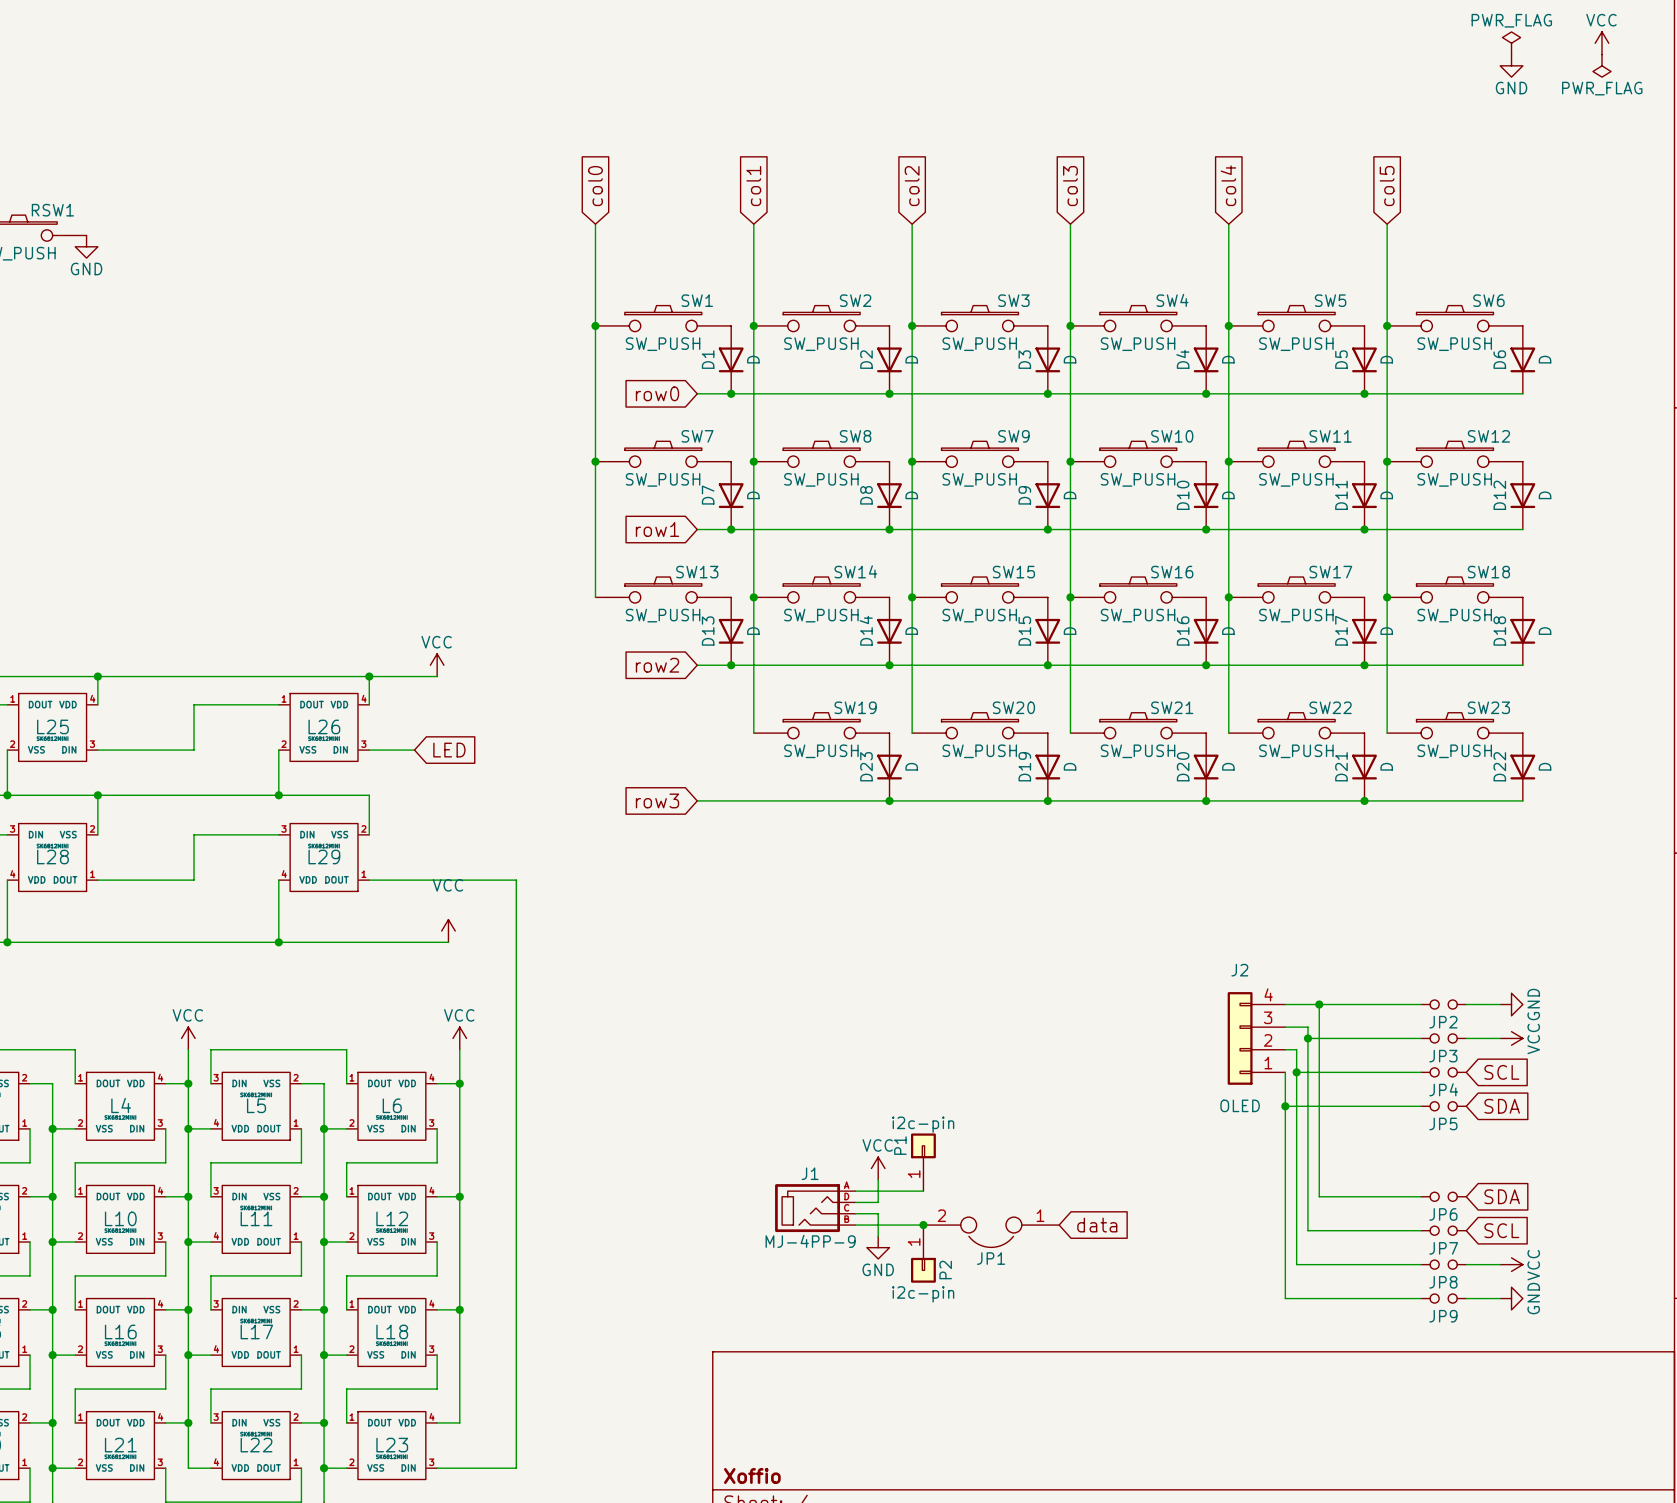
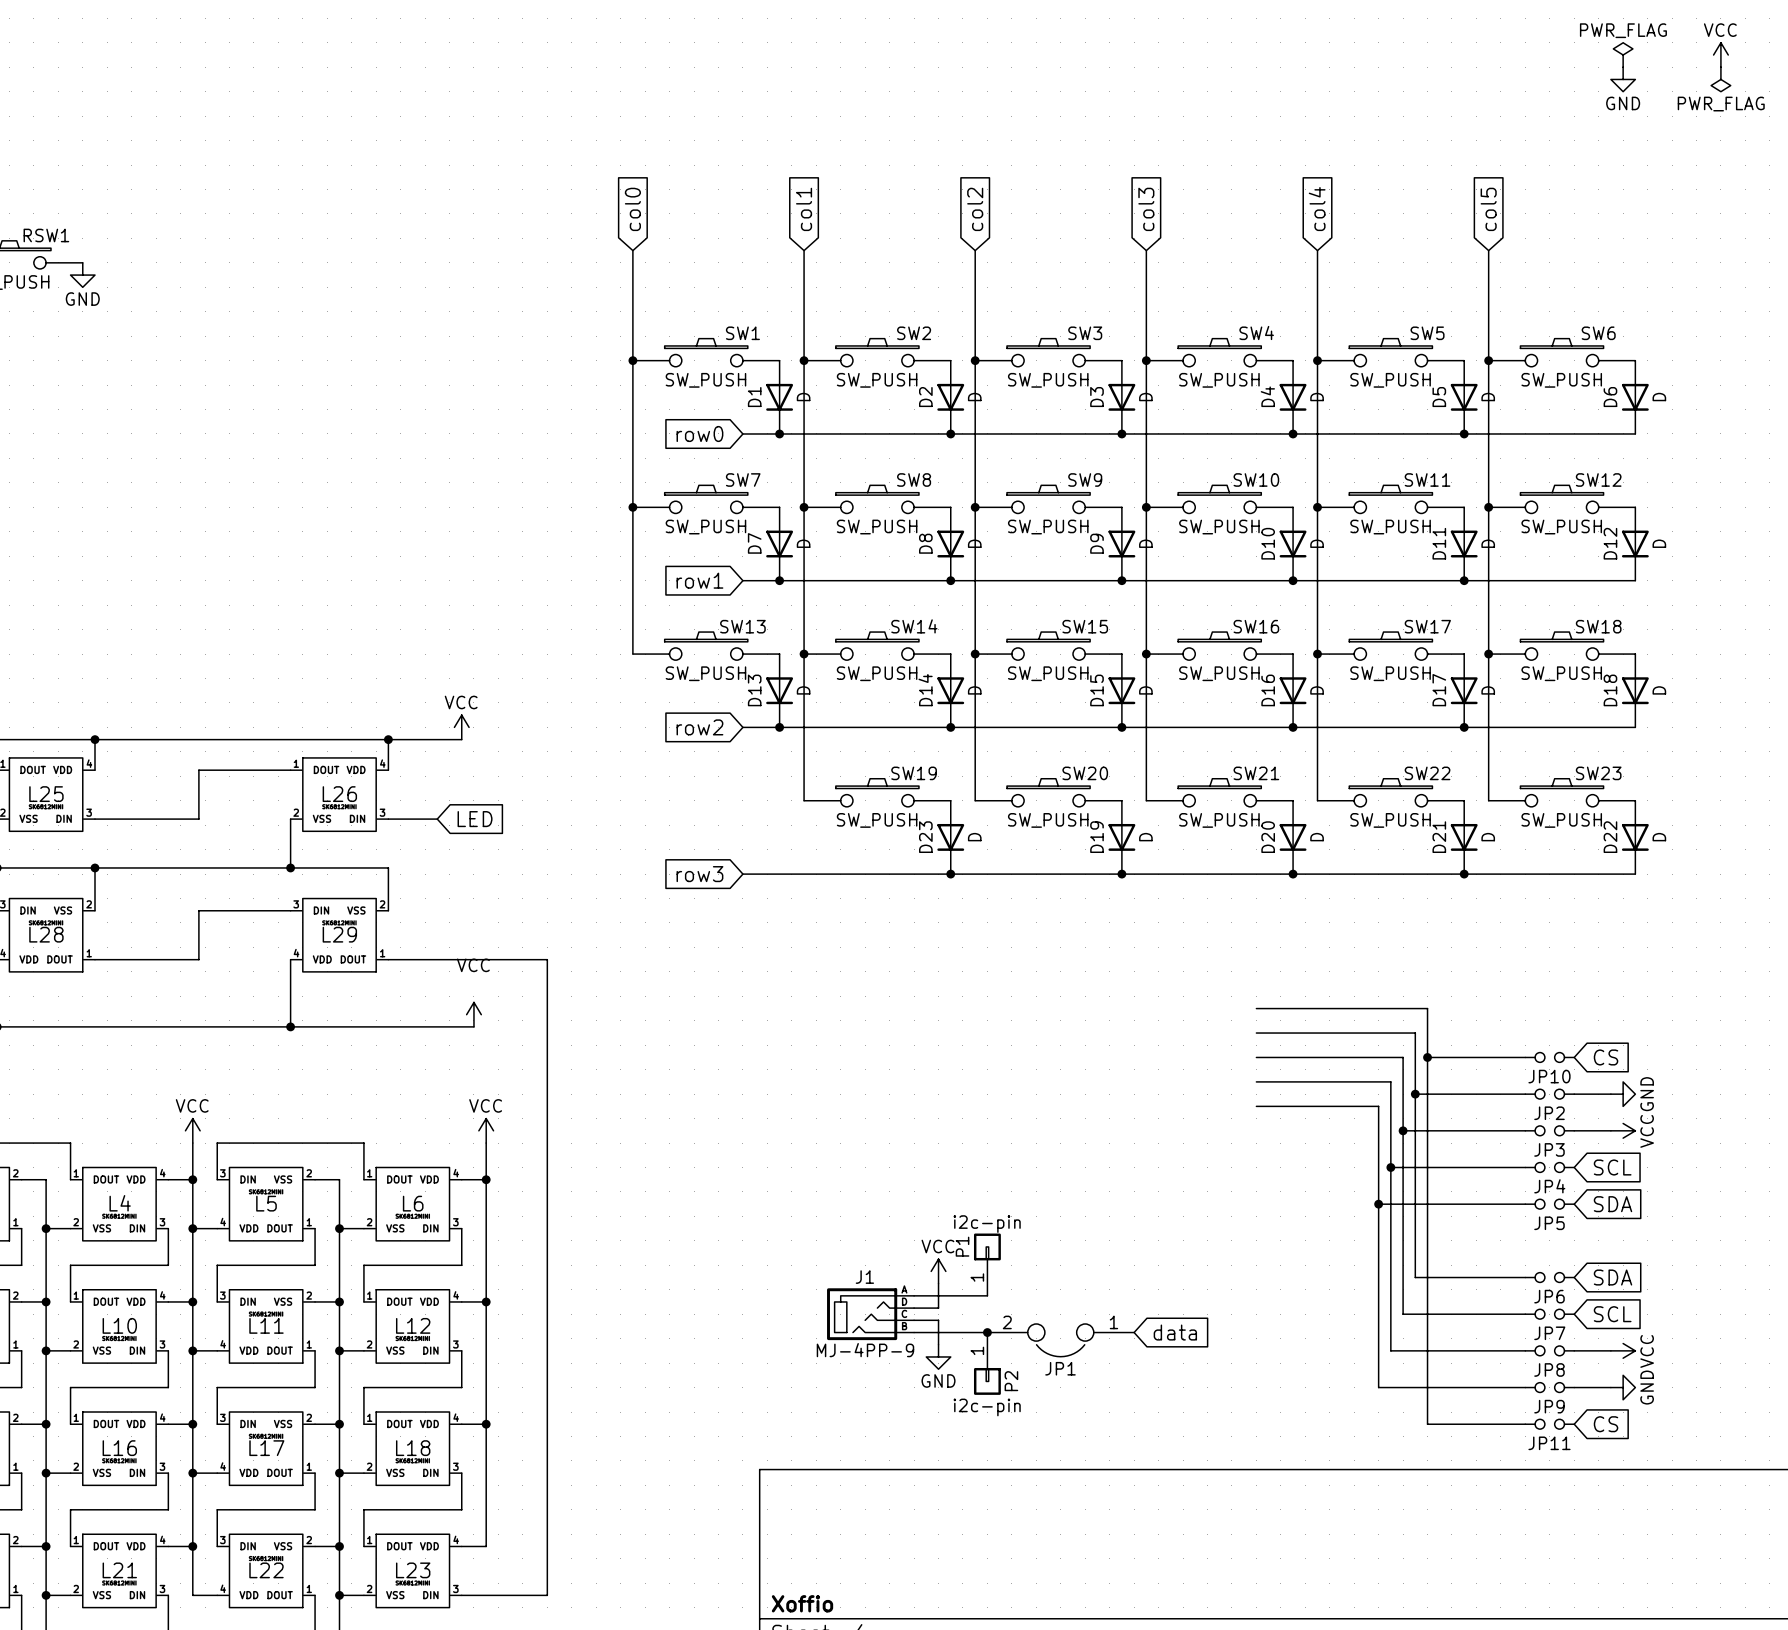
wire: none -> (1256, 1008) (1427, 1008) (1427, 1424) (1525, 1424)
wire: none -> (1427, 1057) (1525, 1057)
junction: none -> (1427, 1057)
JP10: none -> (1549, 1057)
global label: none -> CS (1606, 1057)
wire: (1285, 1004) (1319, 1004) -> (1256, 1033) (1415, 1033) (1415, 1094)
wire: none -> (1256, 1106) (1378, 1106) (1378, 1167)
wire: (1285, 1027) (1307, 1027) -> (1256, 1057) (1403, 1057) (1403, 1118)
J2: OLED (1256, 1038) -> none
wire: (1285, 1049) (1296, 1049) -> (1256, 1081) (1390, 1081) (1390, 1143)
wire: (1319, 1174) (1319, 1196) (1421, 1196) -> (1415, 1277) (1525, 1277)
JP6 position: (1443, 1196) -> (1549, 1277)
global label position: SDA (1502, 1196) -> SDA (1613, 1277)
wire: (1307, 1208) (1307, 1230) (1421, 1230) -> (1403, 1314) (1525, 1314)
JP7 position: (1443, 1230) -> (1549, 1314)
global label position: SCL (1501, 1230) -> SCL (1612, 1314)
wire: (1296, 1242) (1296, 1264) (1421, 1264) -> (1390, 1350) (1525, 1350)
JP8 position: (1443, 1264) -> (1549, 1350)
wire: (1466, 1264) (1500, 1264) -> (1574, 1350) (1610, 1350)
power symbol position: VCC (1511, 1264) -> VCC (1623, 1350)
wire: (1285, 1275) (1285, 1298) (1421, 1298) -> (1378, 1387) (1525, 1387)
JP9 position: (1443, 1298) -> (1549, 1387)
wire: (1466, 1298) (1500, 1298) -> (1574, 1387) (1610, 1387)
power symbol position: GND (1511, 1298) -> GND (1623, 1387)
JP11: none -> (1549, 1424)
global label: none -> CS (1606, 1424)

